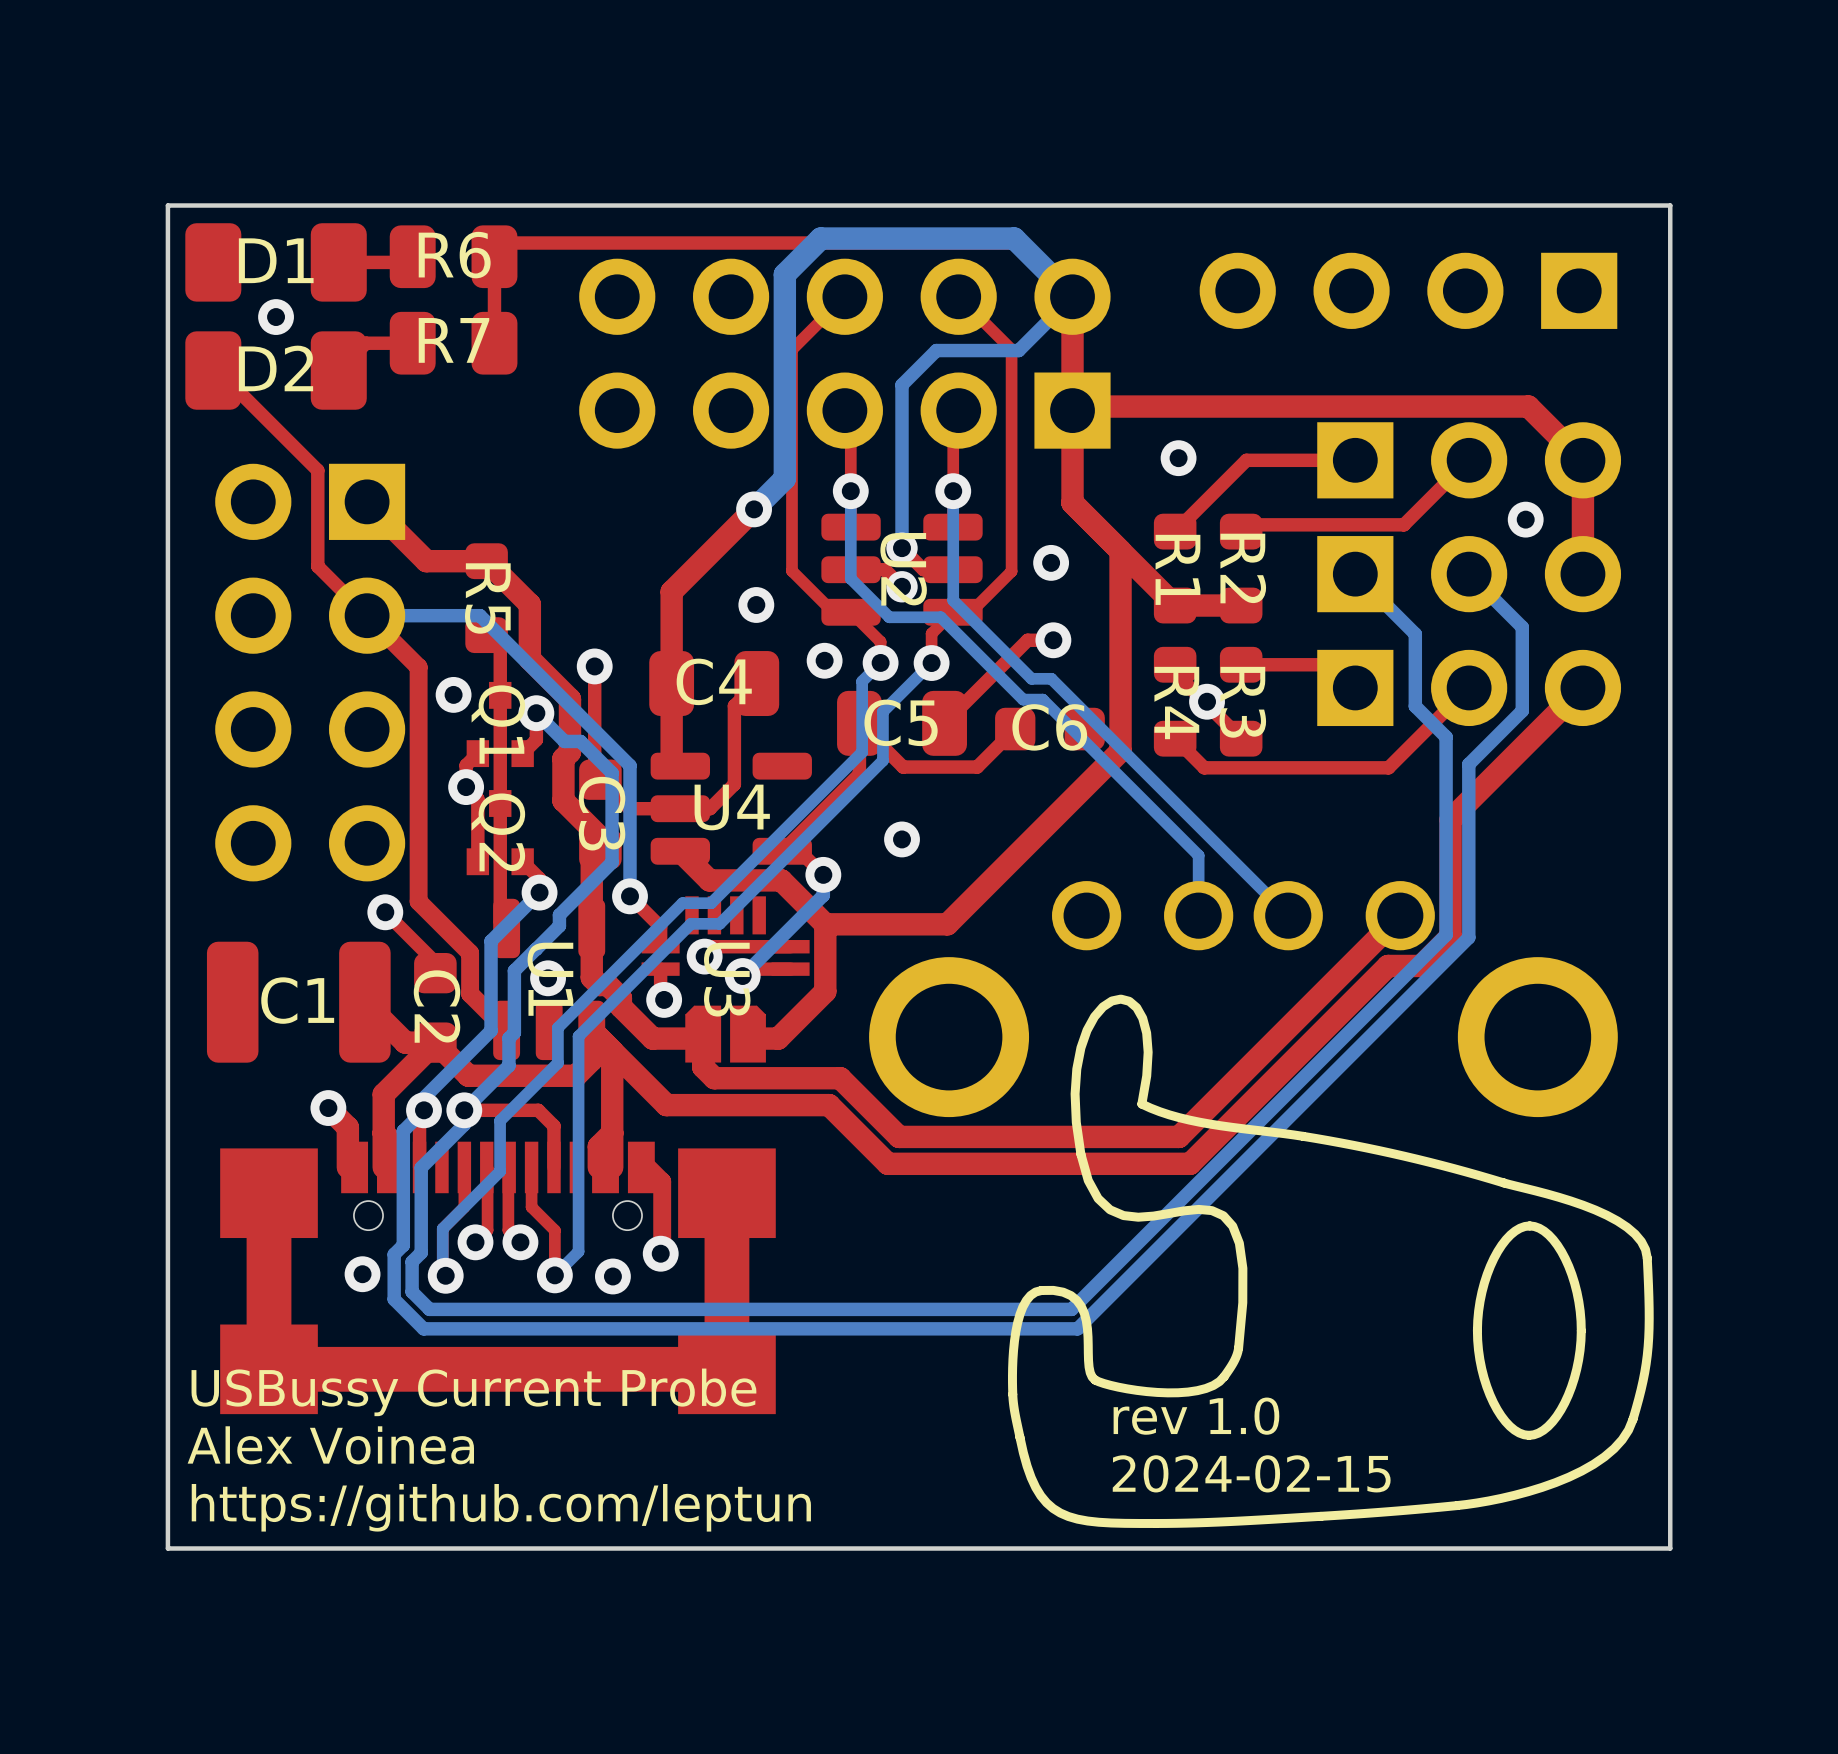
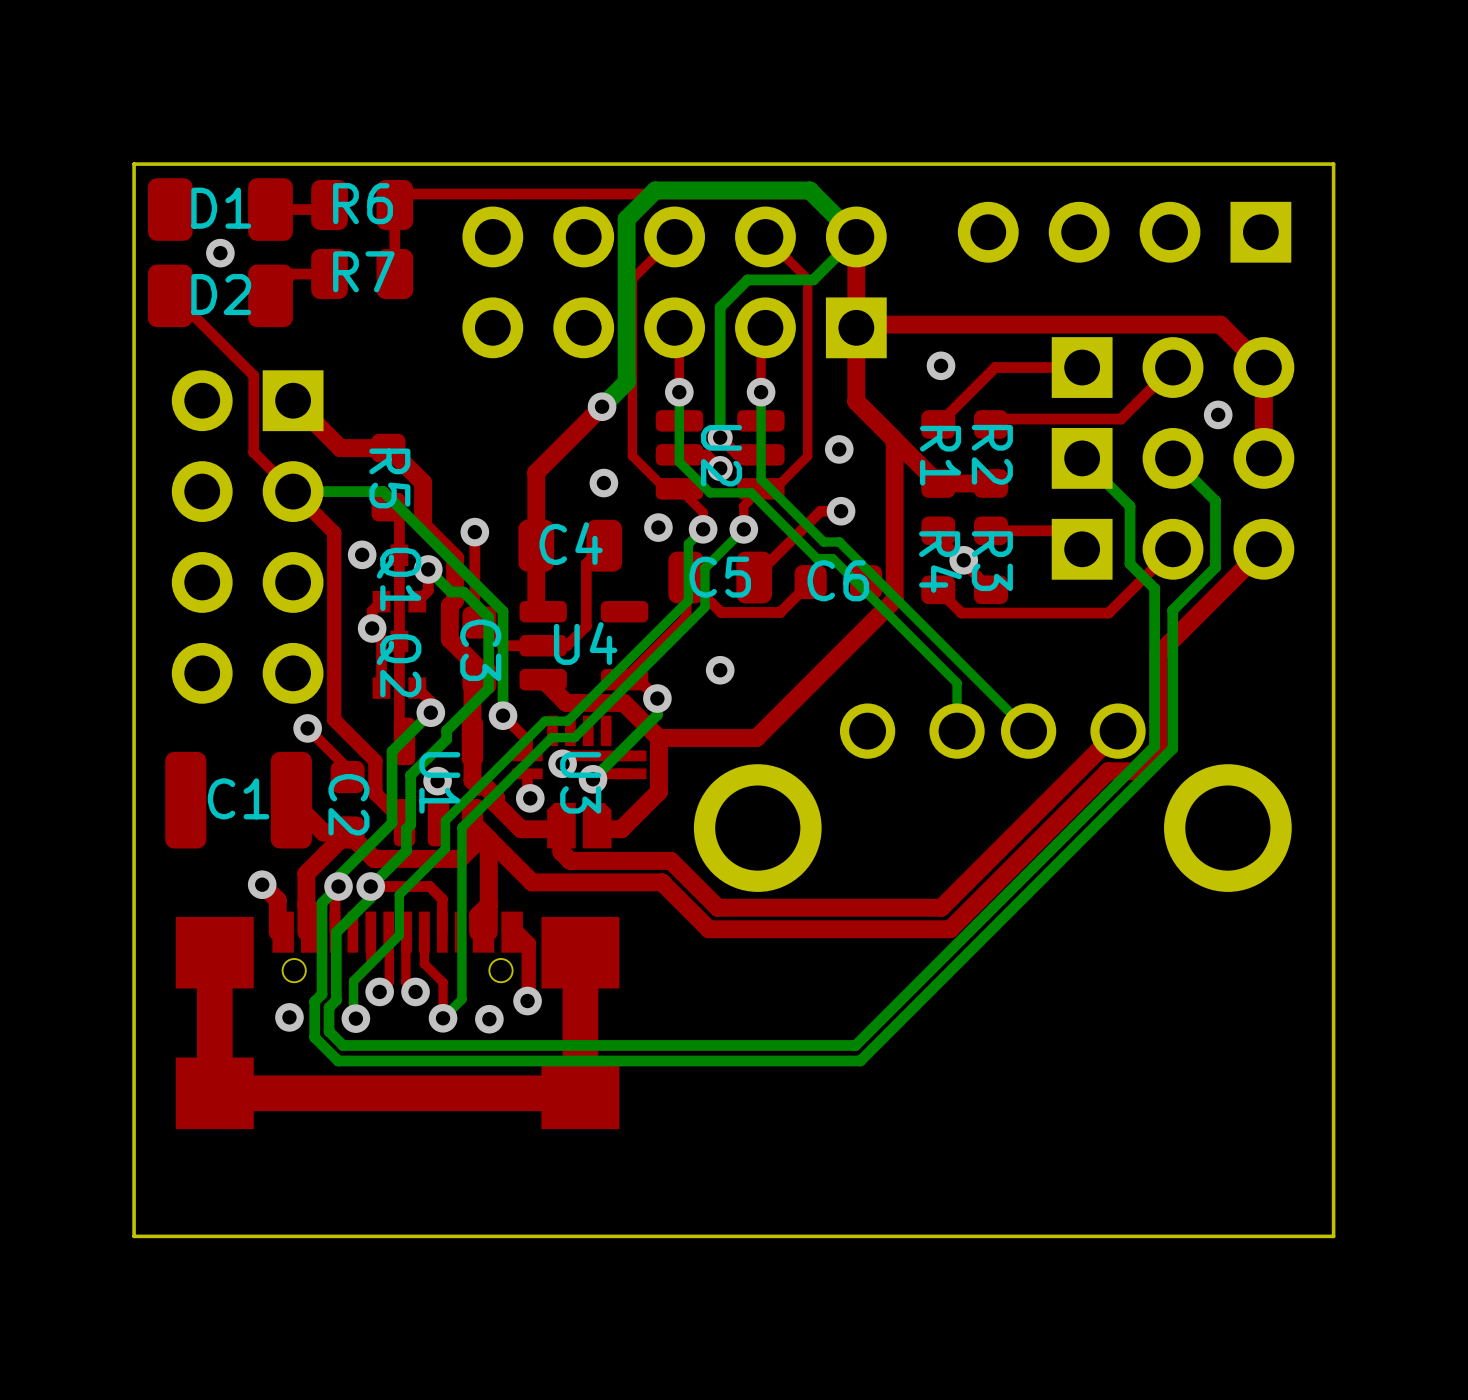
drawing: [1008, 994, 1654, 1528] -> none
text: USBussy Current Probe (473, 1392) -> none
text: rev 1.0 (1196, 1416) -> none
text: Alex Voinea (330, 1445) -> none
text: 2024-02-15 (1251, 1473) -> none
text: https://github.com/leptun (501, 1507) -> none

